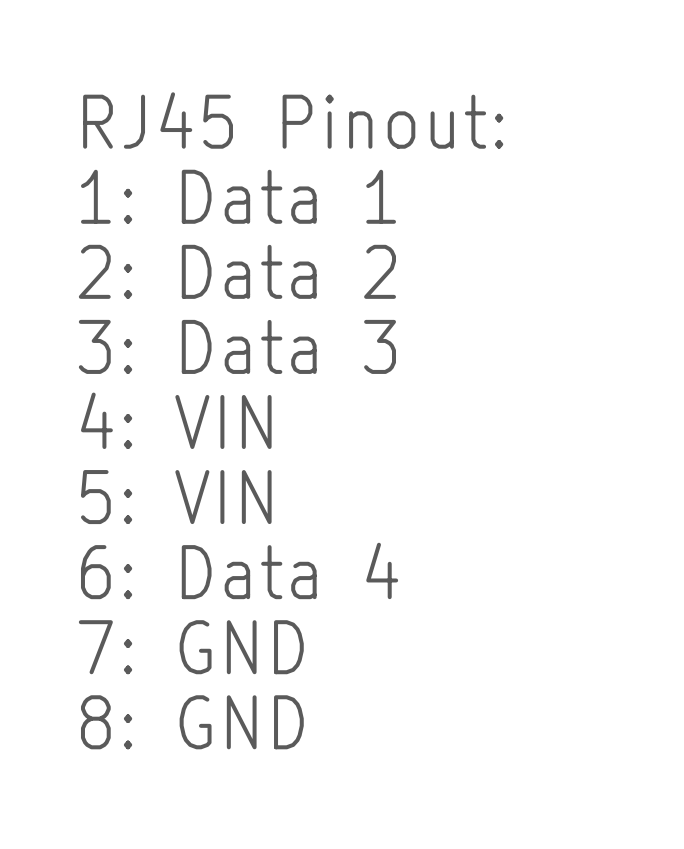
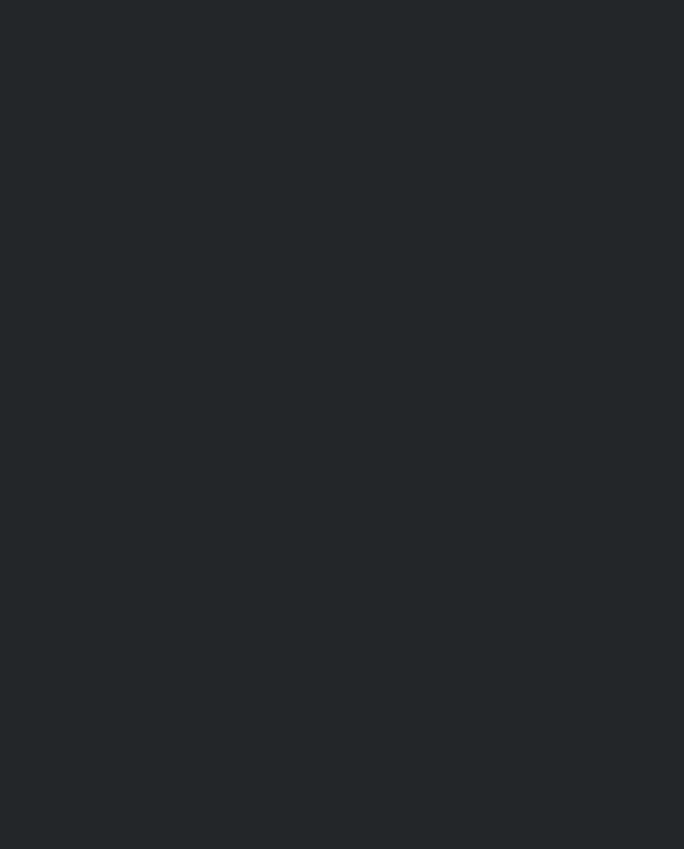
text: RJ45 Pinout: (293, 120) -> none
text: 1: Data 1 (238, 196) -> none
text: 2: Data 2 (237, 271) -> none
text: 3: Data 3 (237, 346) -> none
text: 4: VIN (176, 420) -> none
text: 5: VIN (176, 497) -> none
text: 6: Data 4 (239, 570) -> none
text: 7: GND (191, 647) -> none
text: 8: GND (192, 722) -> none

